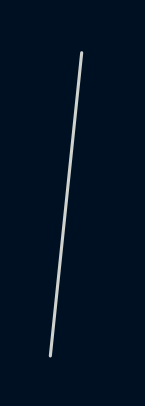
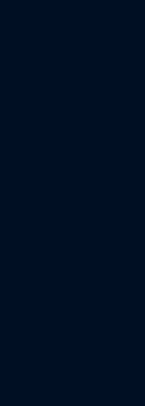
board edge: (81, 52) (50, 355) -> none

